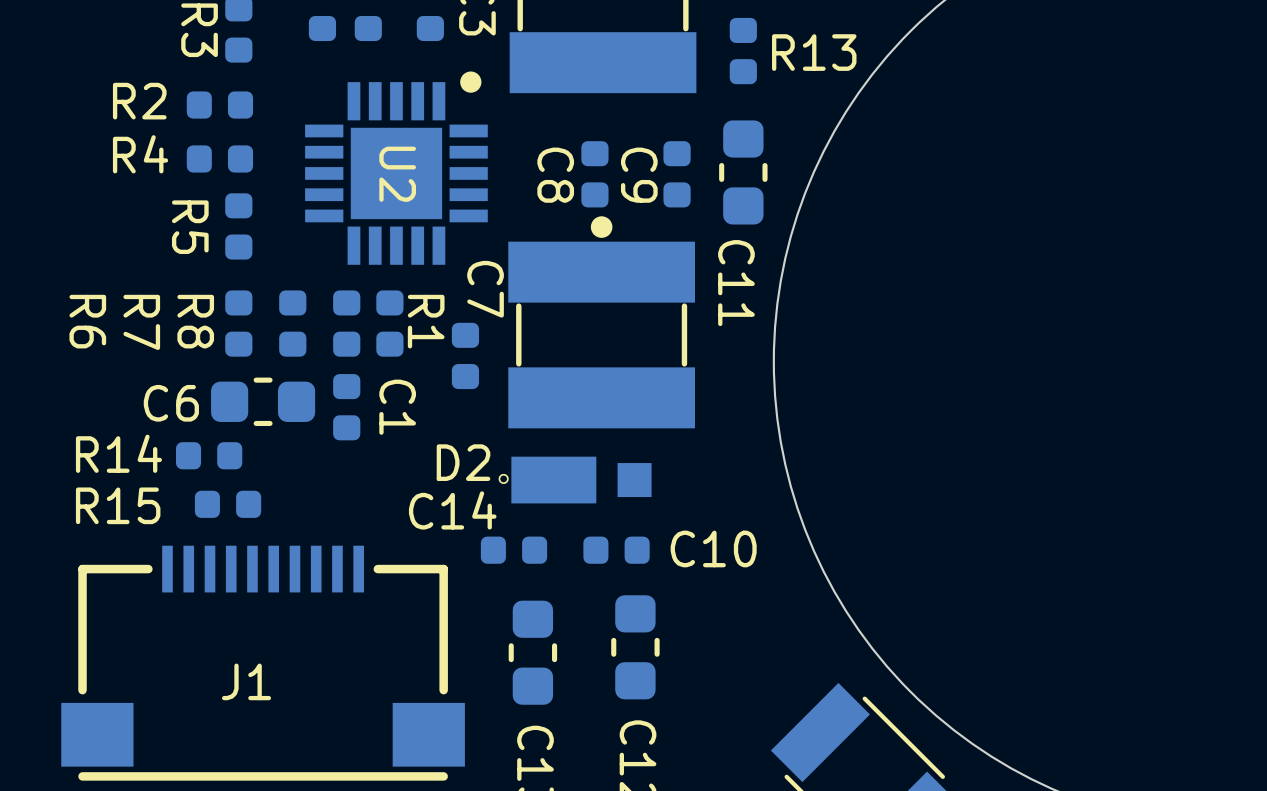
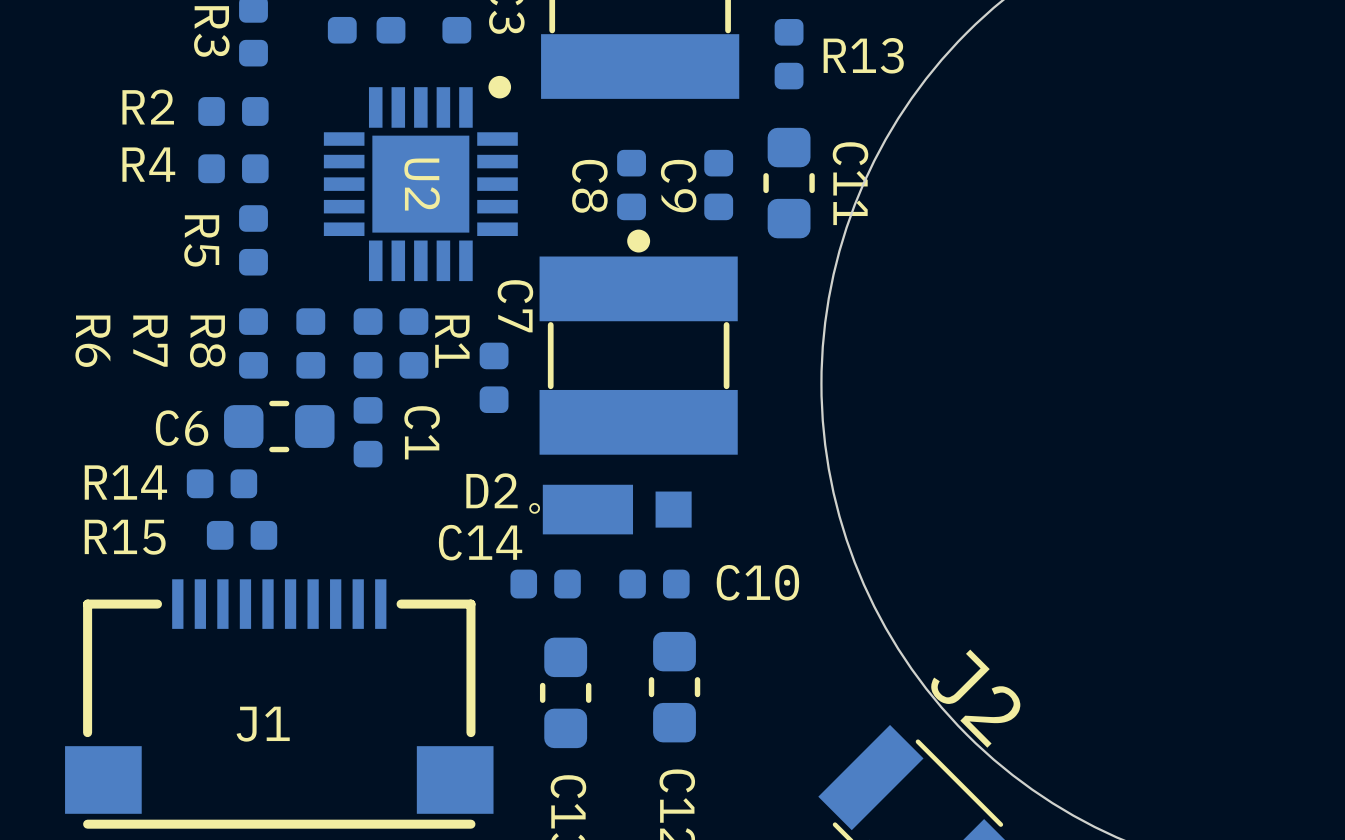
C11 name position: C11 (736, 283) -> C11 (850, 183)
J2 name: none -> J2 (975, 698)

